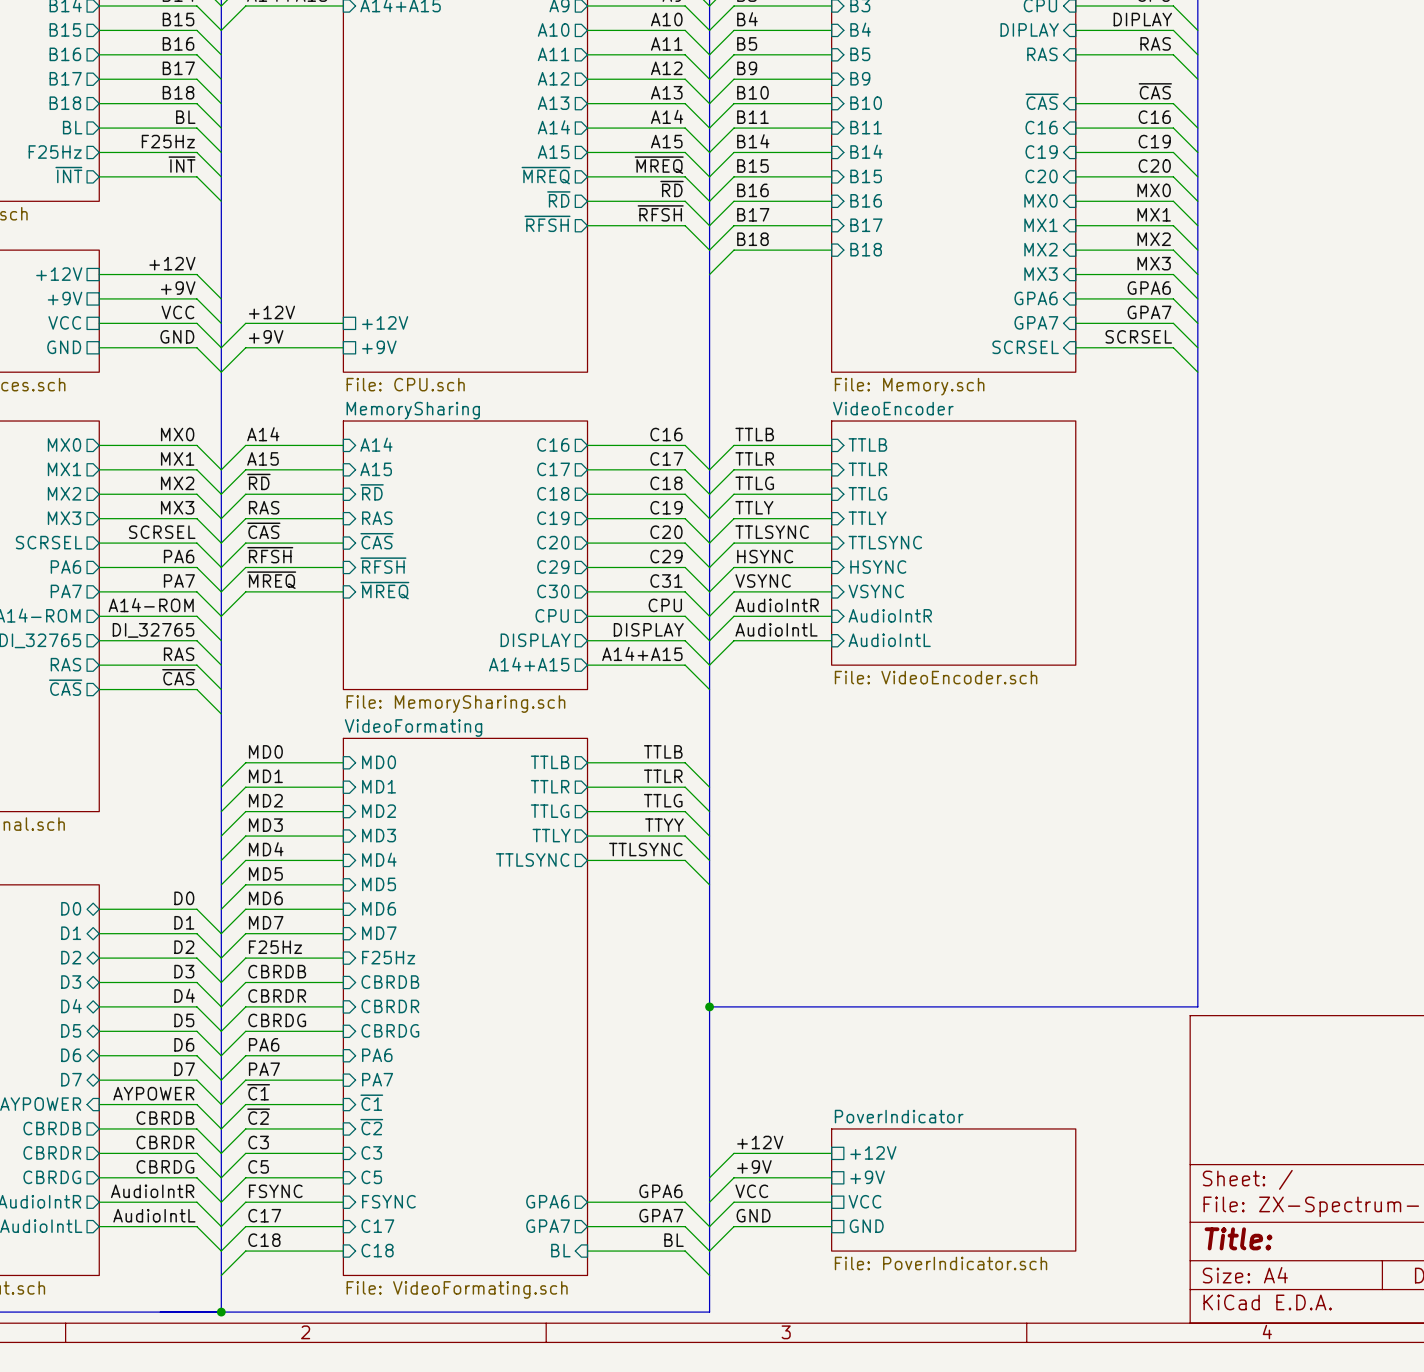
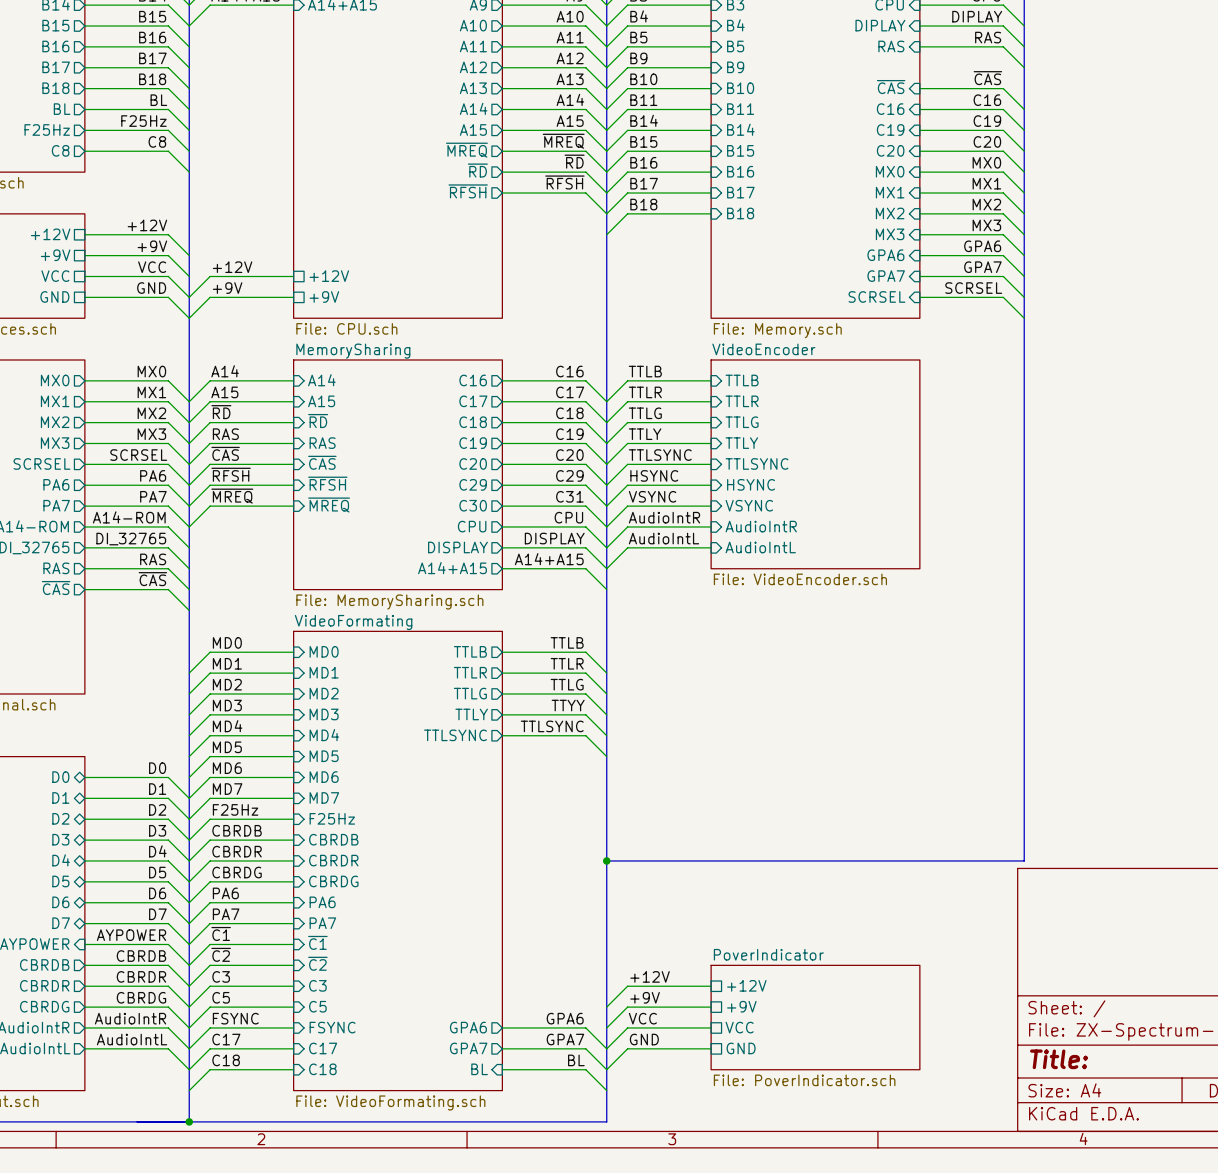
label: ~{INT} (182, 164) -> C8 (157, 141)
sheet pin: ~{INT} (68, 175) -> C8 (60, 150)

